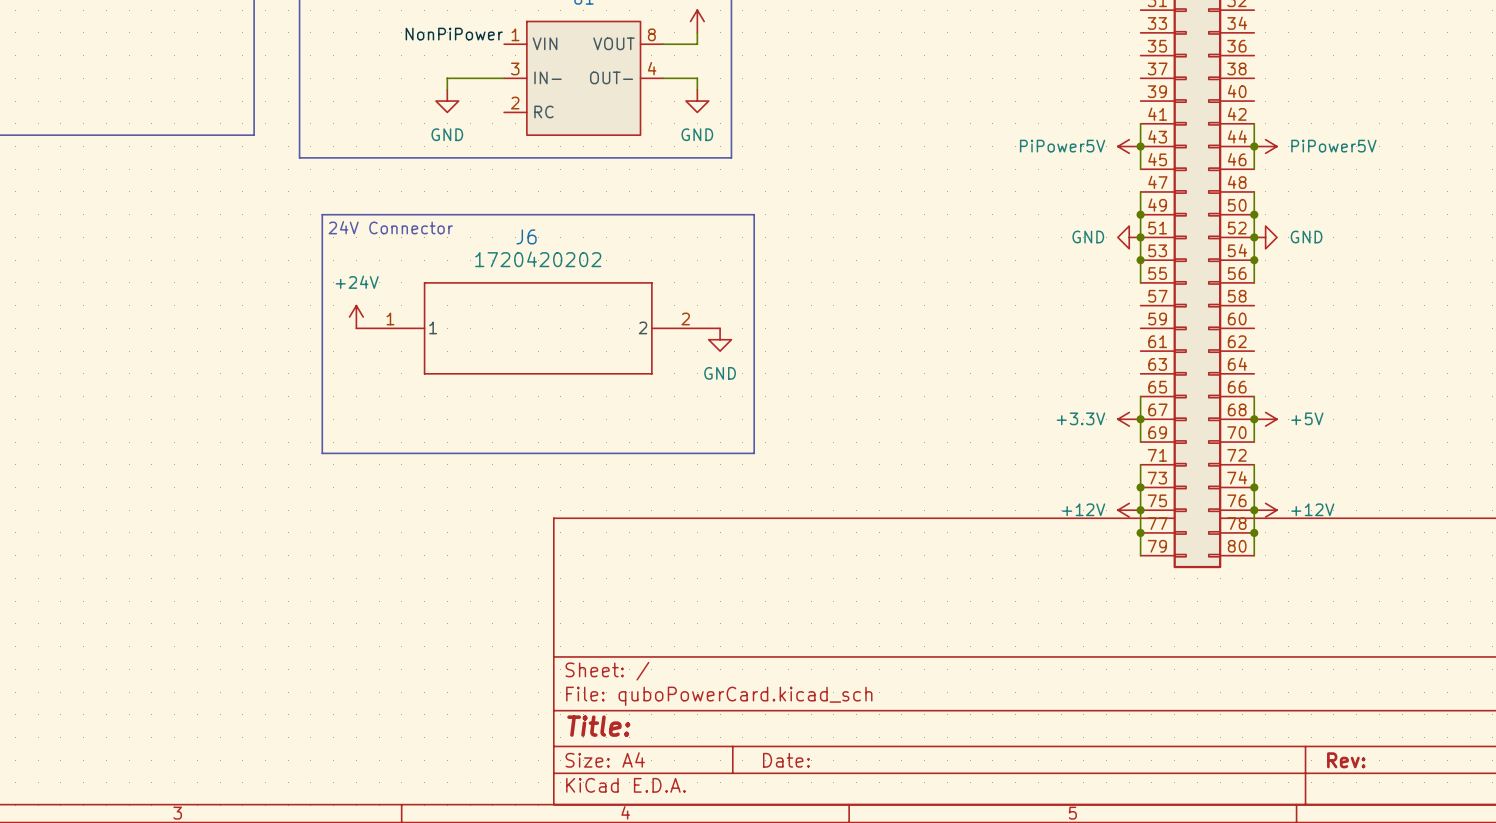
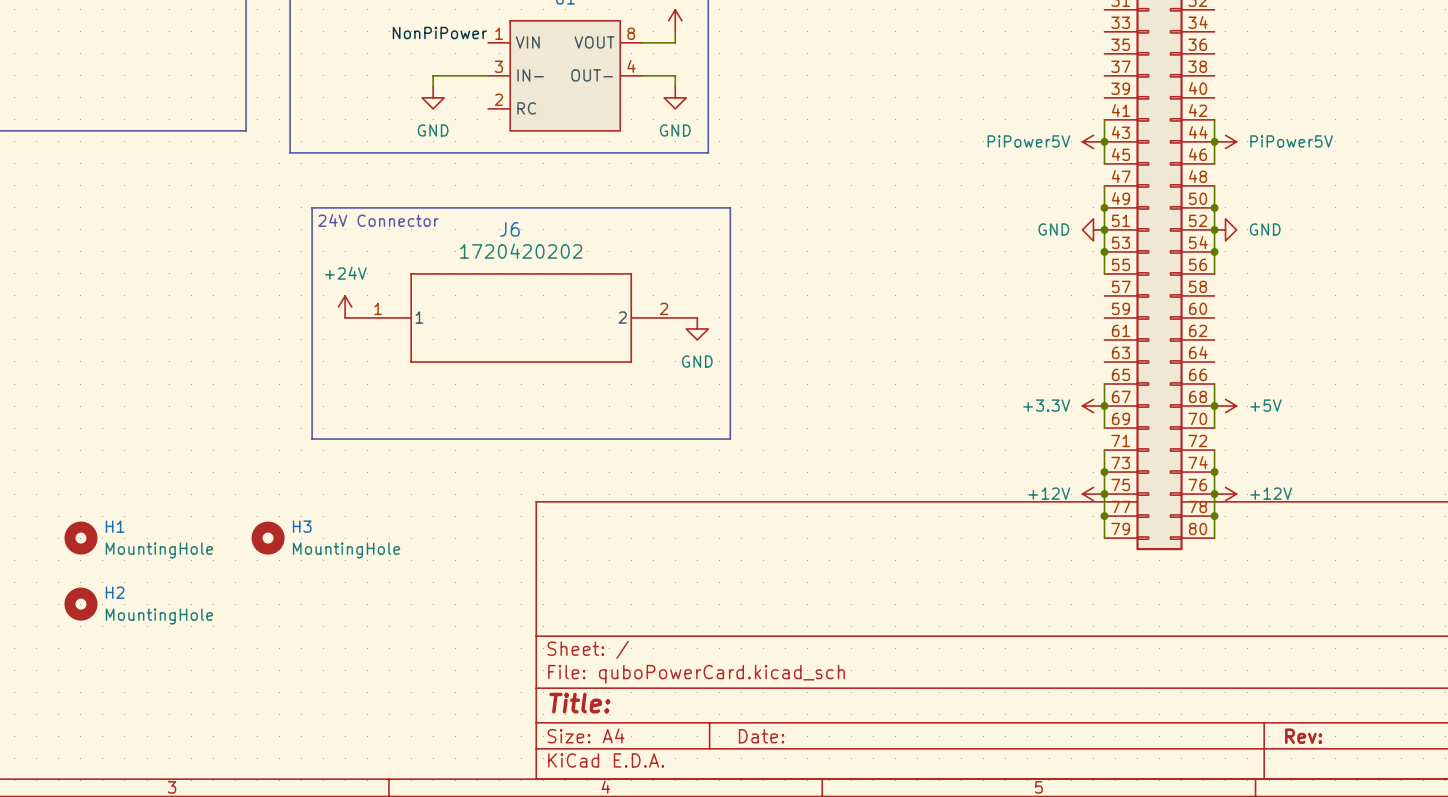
H1: none -> MountingHole (80, 538)
H3: none -> MountingHole (268, 538)
H2: none -> MountingHole (80, 604)

